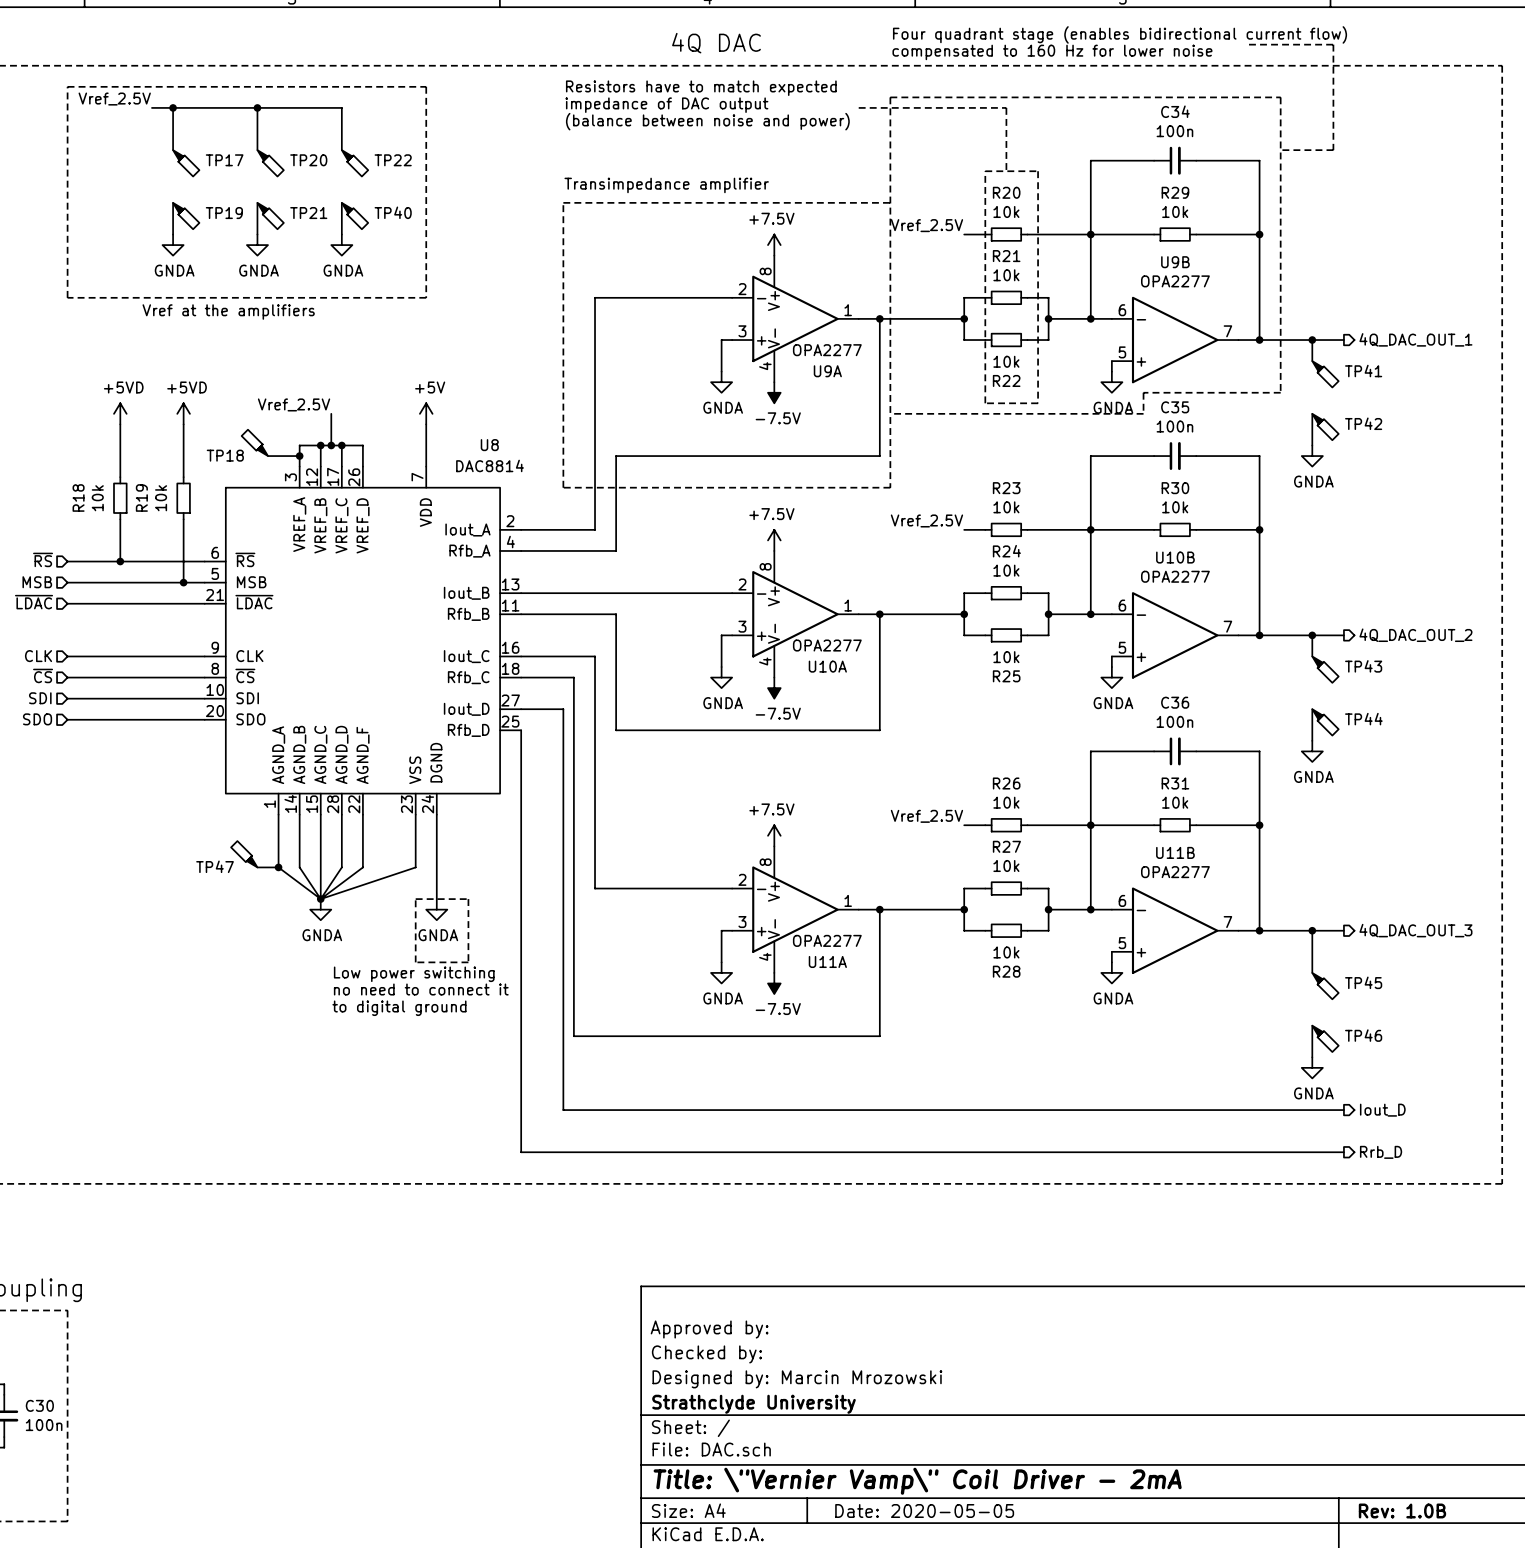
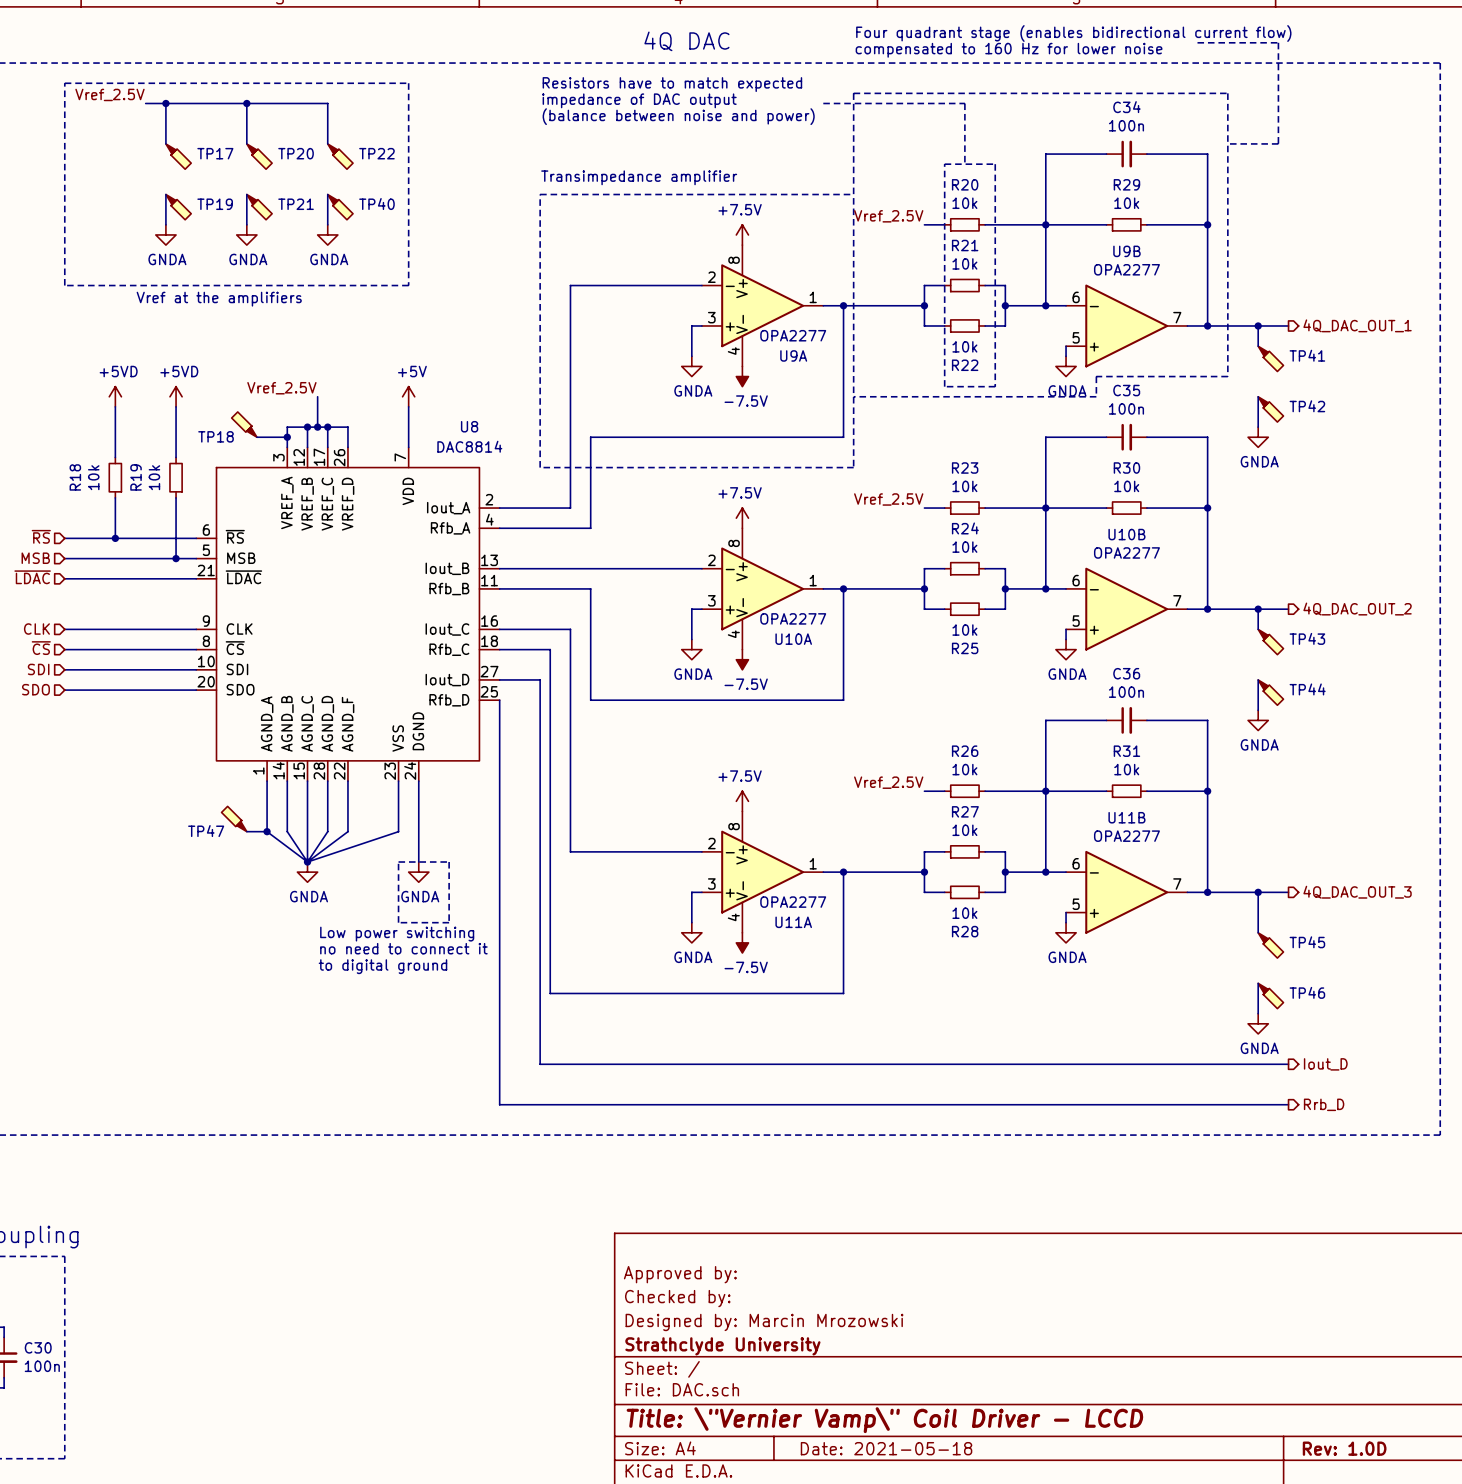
title block: Title: \"Vernier Vamp\" Coil Driver - 2mA (917, 1481) -> Title: \"Vernier Vamp\" Coil Driver - LCCD (884, 1420)
title block: Date: 2020-05-05 (924, 1510) -> Date: 2021-05-18 (886, 1448)
title block: Rev: 1.0B (1402, 1510) -> Rev: 1.0D (1344, 1448)

